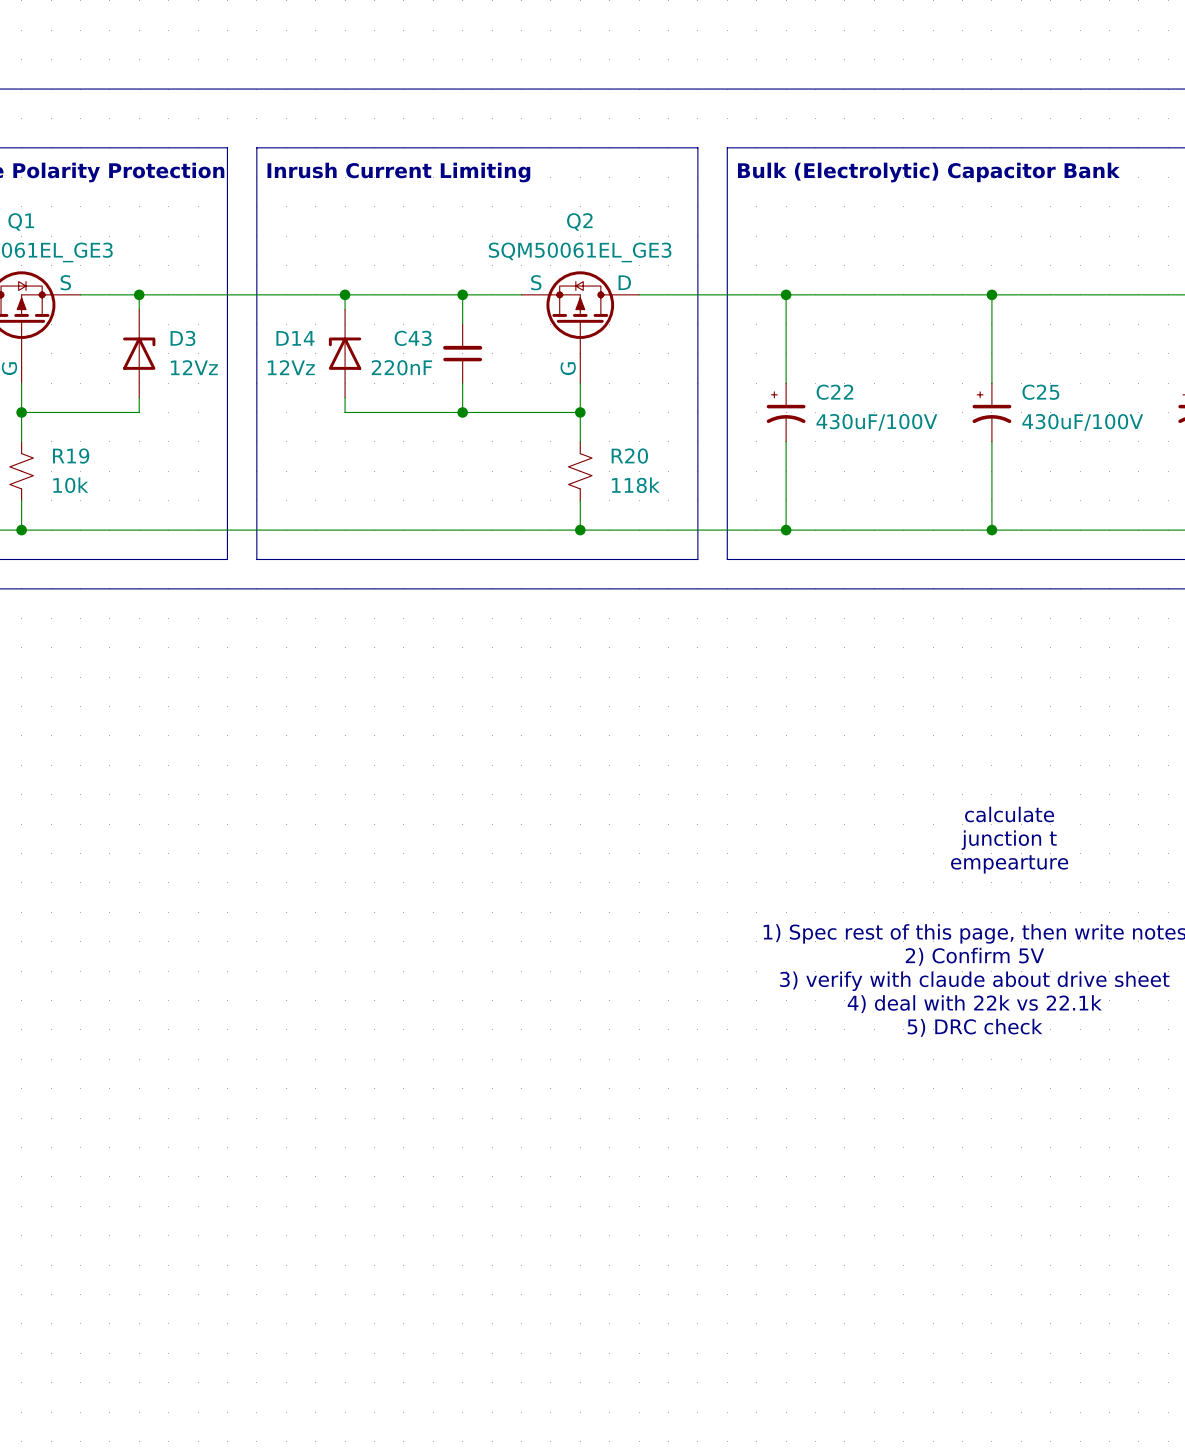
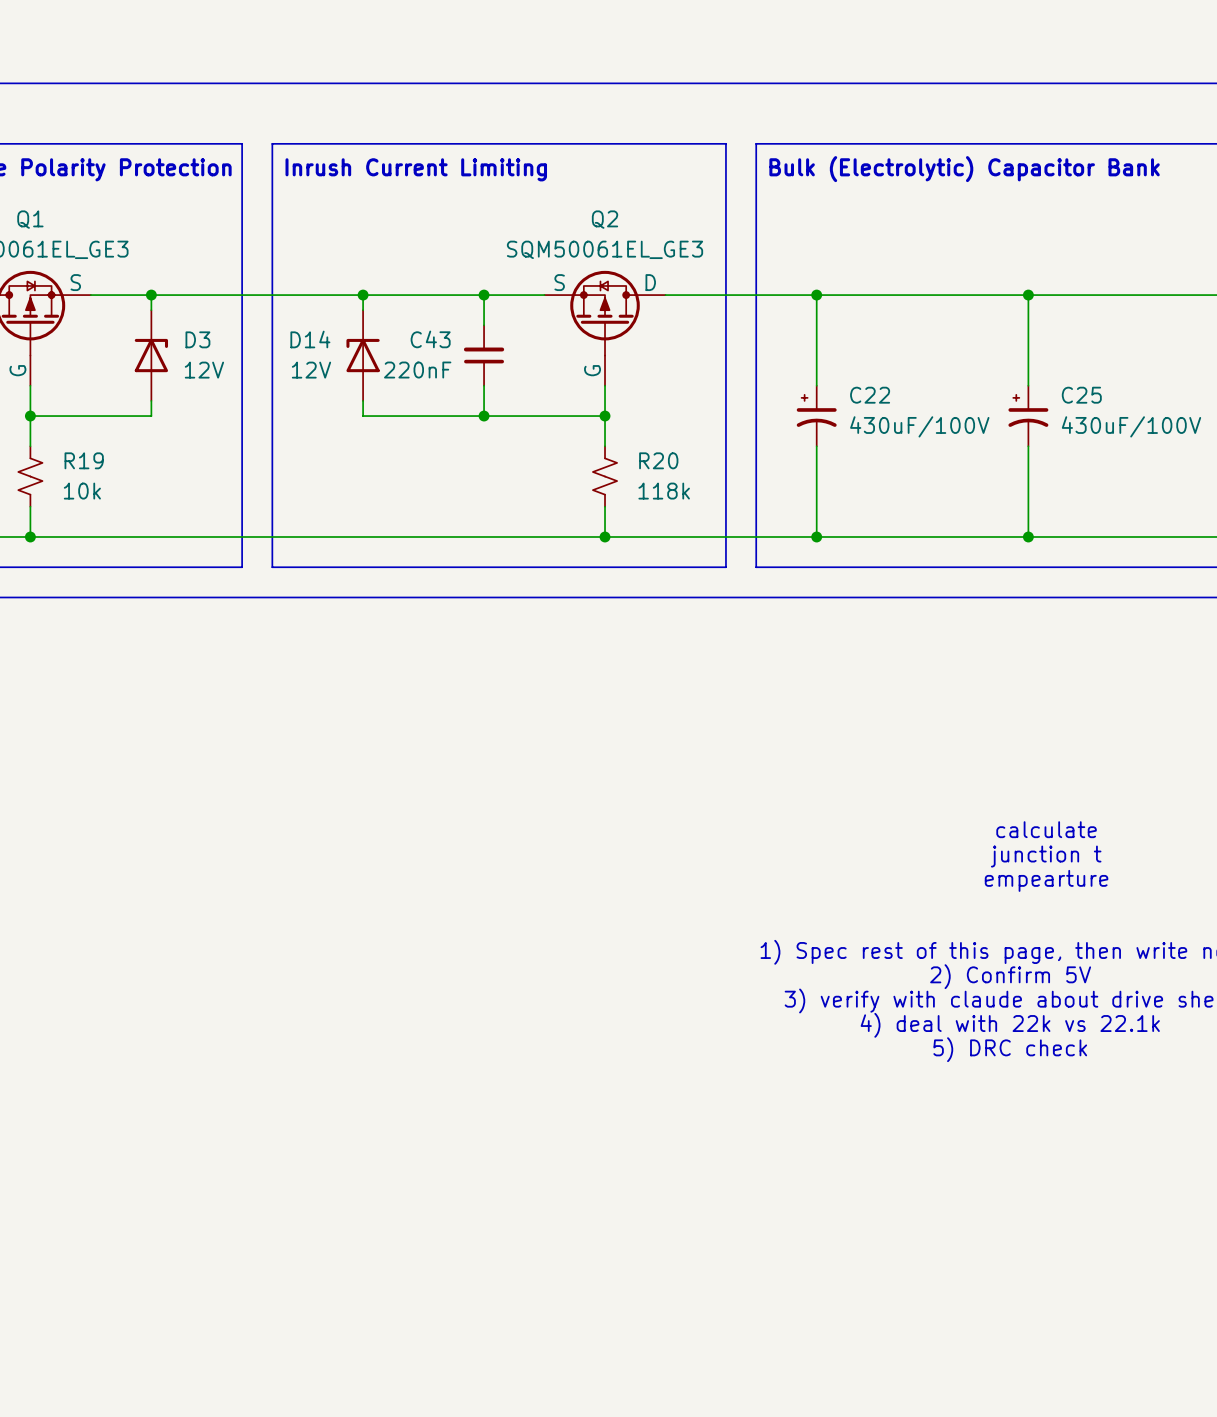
D3 value: 12Vz (194, 367) -> 12V (204, 370)
D14 value: 12Vz (291, 367) -> 12V (311, 370)

